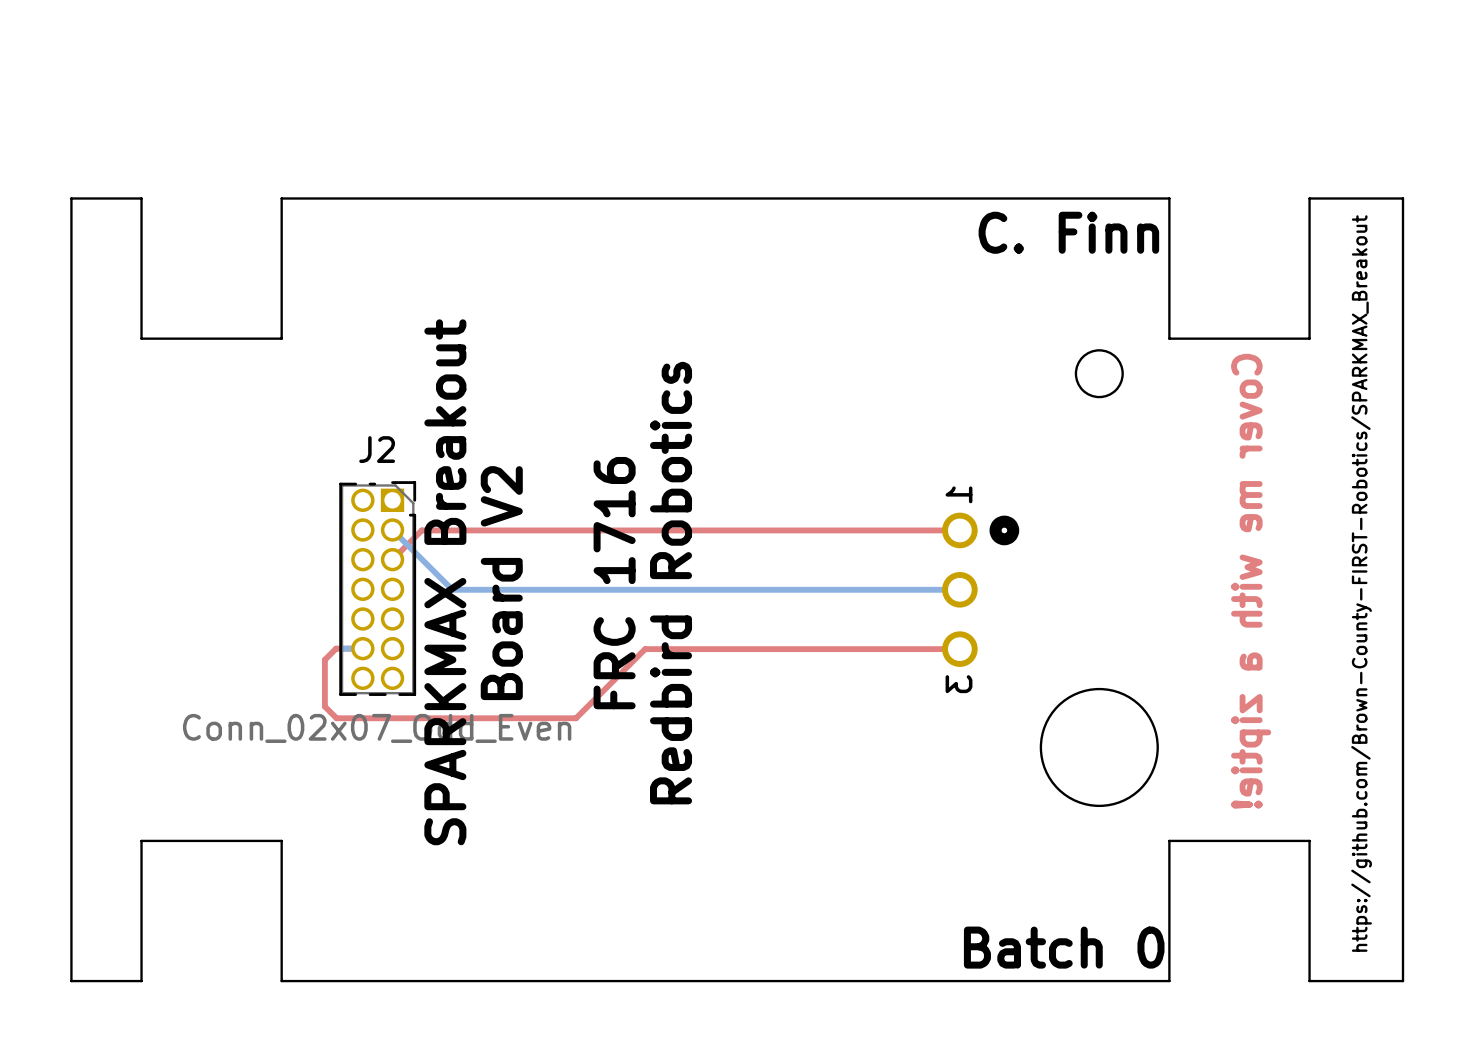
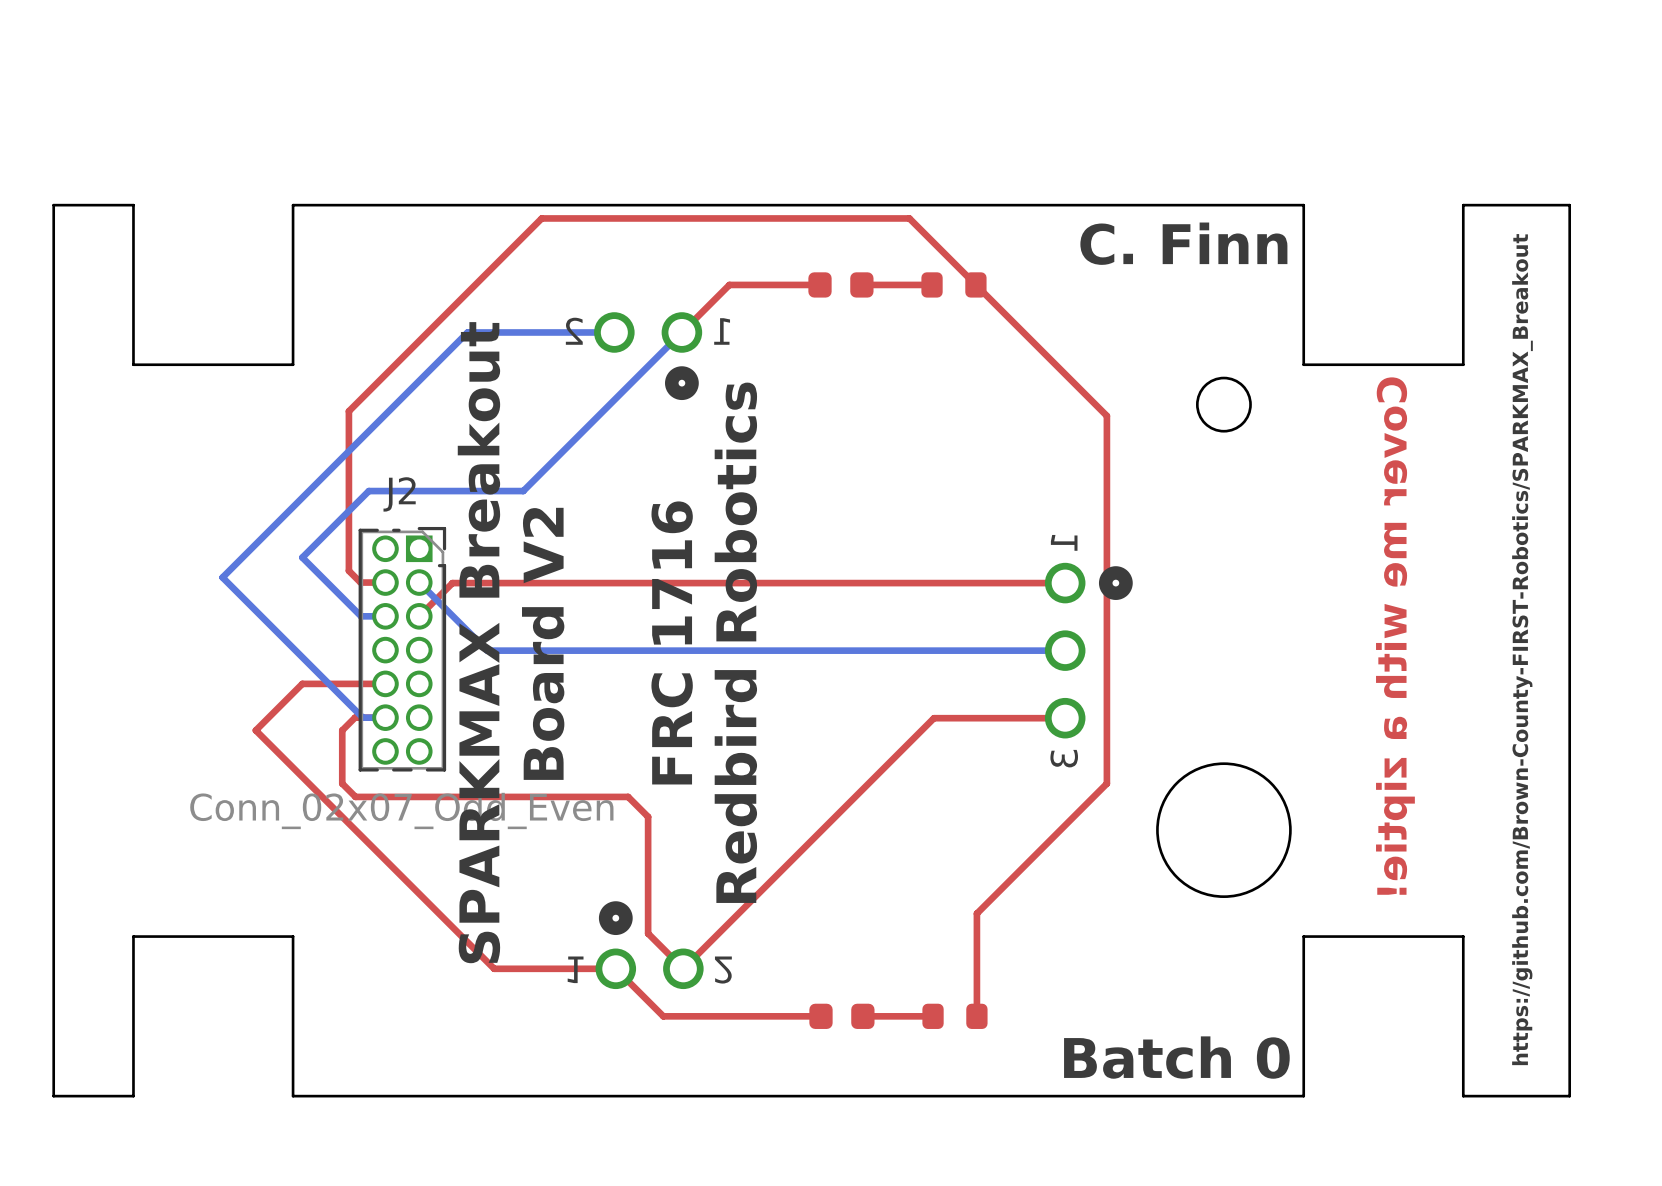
top track: none -> (819, 284) (729, 284) (681, 332)
part: none -> (840, 284)
top track: none -> (932, 284) (861, 284)
part: none -> (953, 284)
bottom track: none -> (614, 332) (467, 332) (222, 577) (362, 717)
bottom track: none -> (681, 332) (523, 491) (368, 491) (302, 557) (361, 616) (385, 616)
part: none -> (648, 356)
top track: none -> (385, 582) (360, 582) (348, 570) (348, 411) (541, 218) (909, 218) (1106, 415) (1106, 783) (976, 913) (976, 1016)
top track: none -> (385, 683) (302, 683) (255, 730) (494, 968) (615, 968) (663, 1016) (820, 1016)
top track: (844, 649) (645, 649) (576, 718) -> (933, 718) (683, 968) (648, 933) (648, 816) (628, 796)
part: none -> (649, 945)
part: none -> (841, 1016)
top track: none -> (933, 1016) (862, 1016)
part: none -> (954, 1016)

